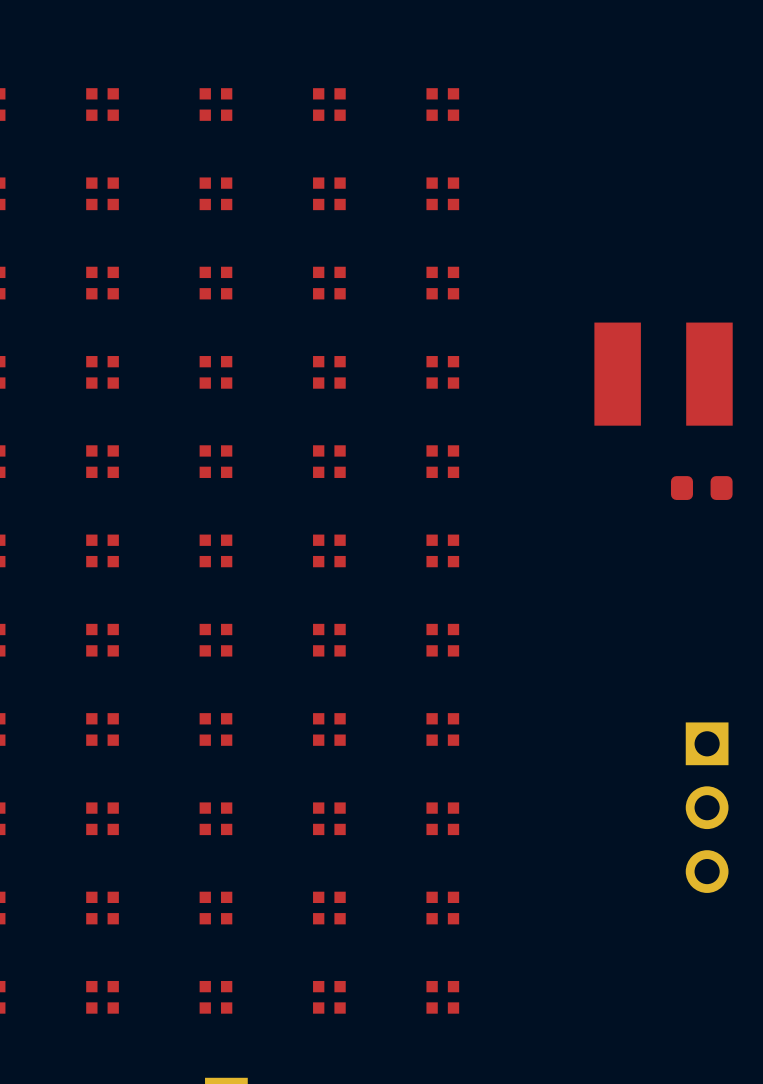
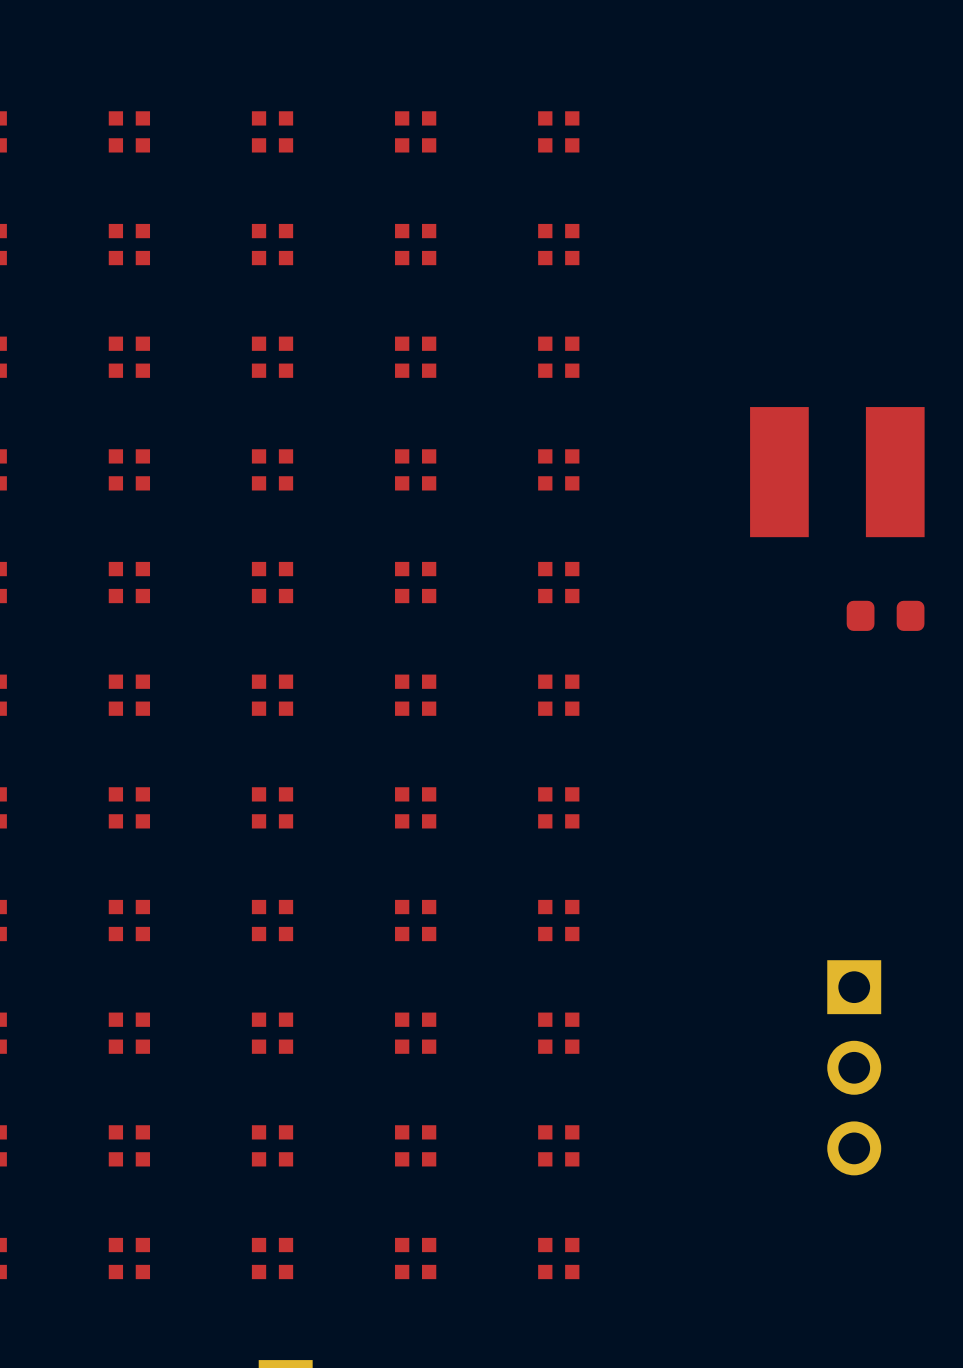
part position: (707, 807) -> (854, 1067)

